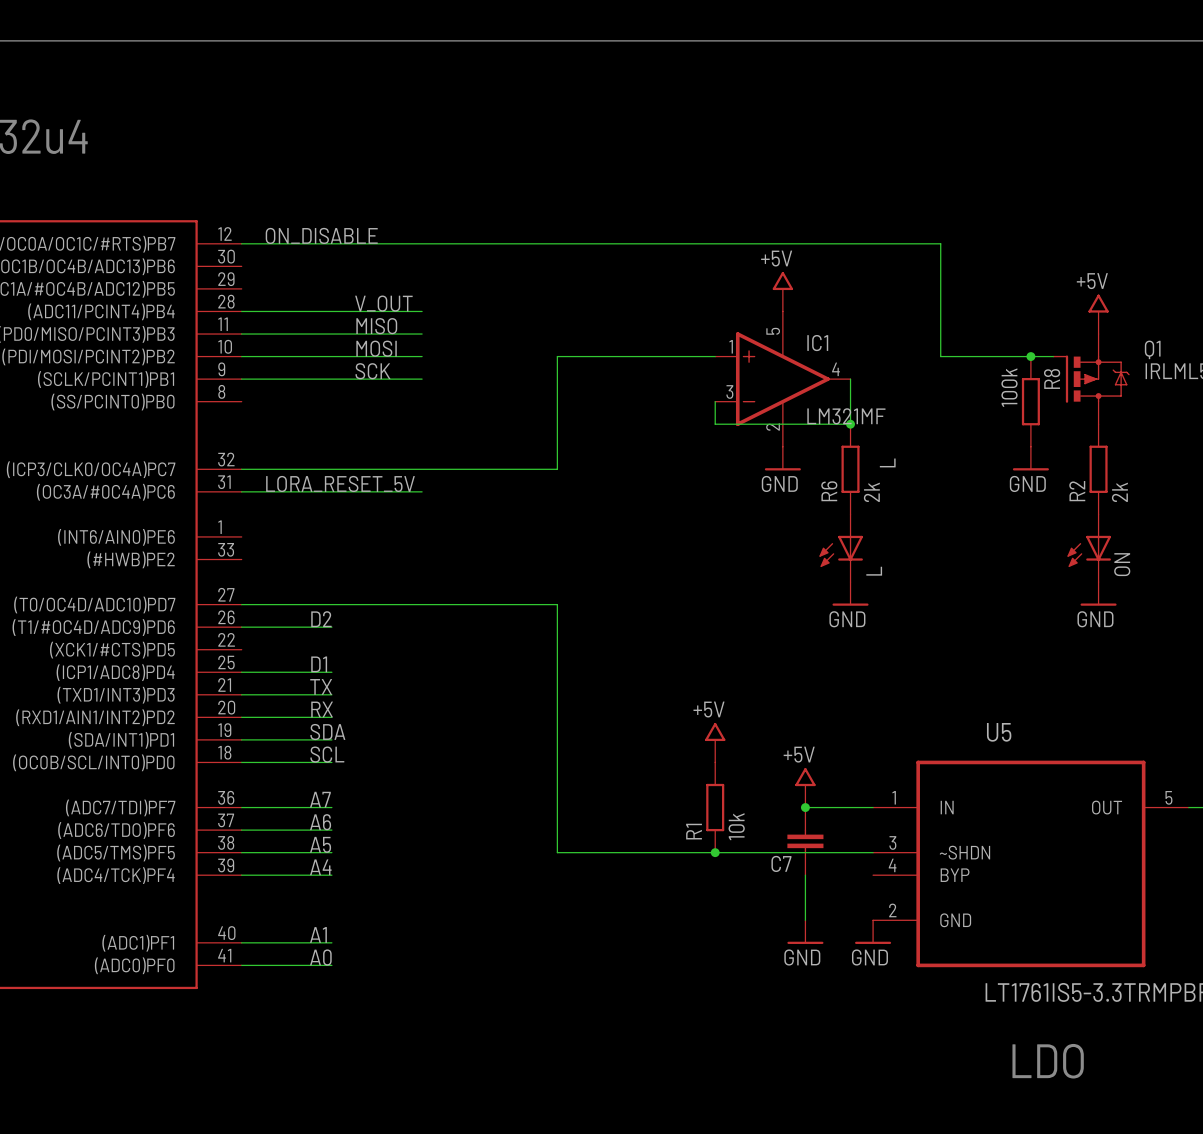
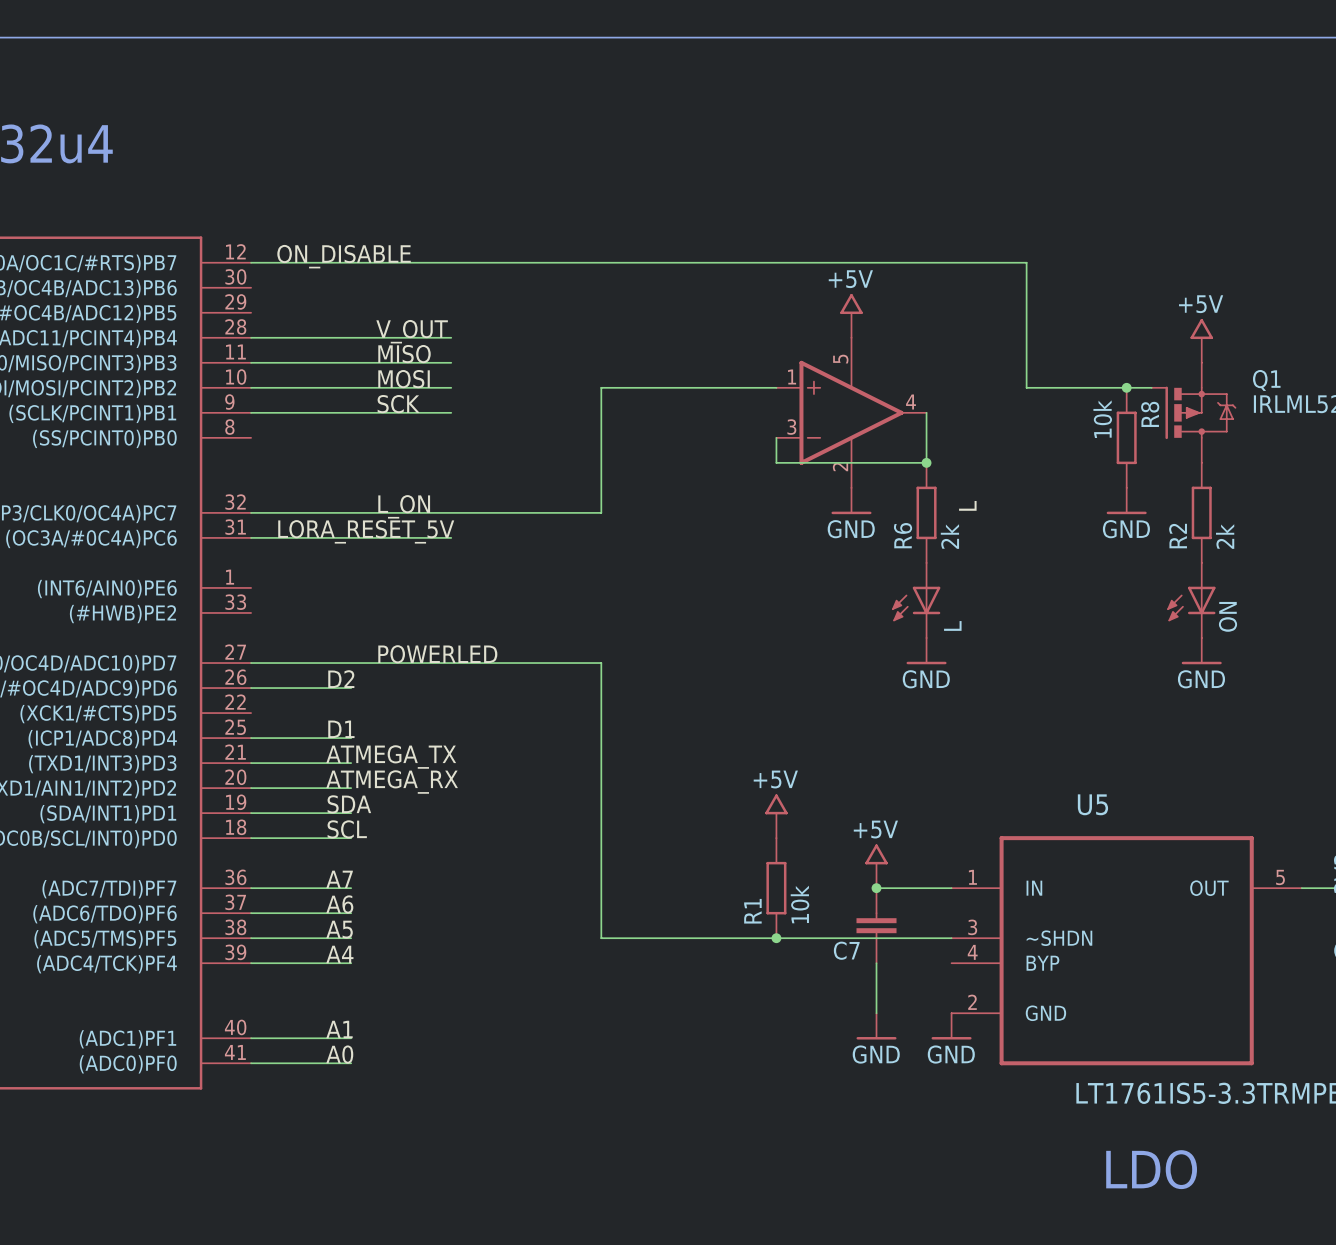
IC1 name: IC1 (817, 343) -> none
R8 value: 100k (1009, 387) -> 10k (1102, 419)
IC1 value: LM321MF (846, 416) -> none
label: none -> L_ON (404, 506)
label: none -> POWERLED (437, 654)
label: TX (321, 686) -> ATMEGA_TX (391, 757)
label: RX (322, 709) -> ATMEGA_RX (392, 782)

